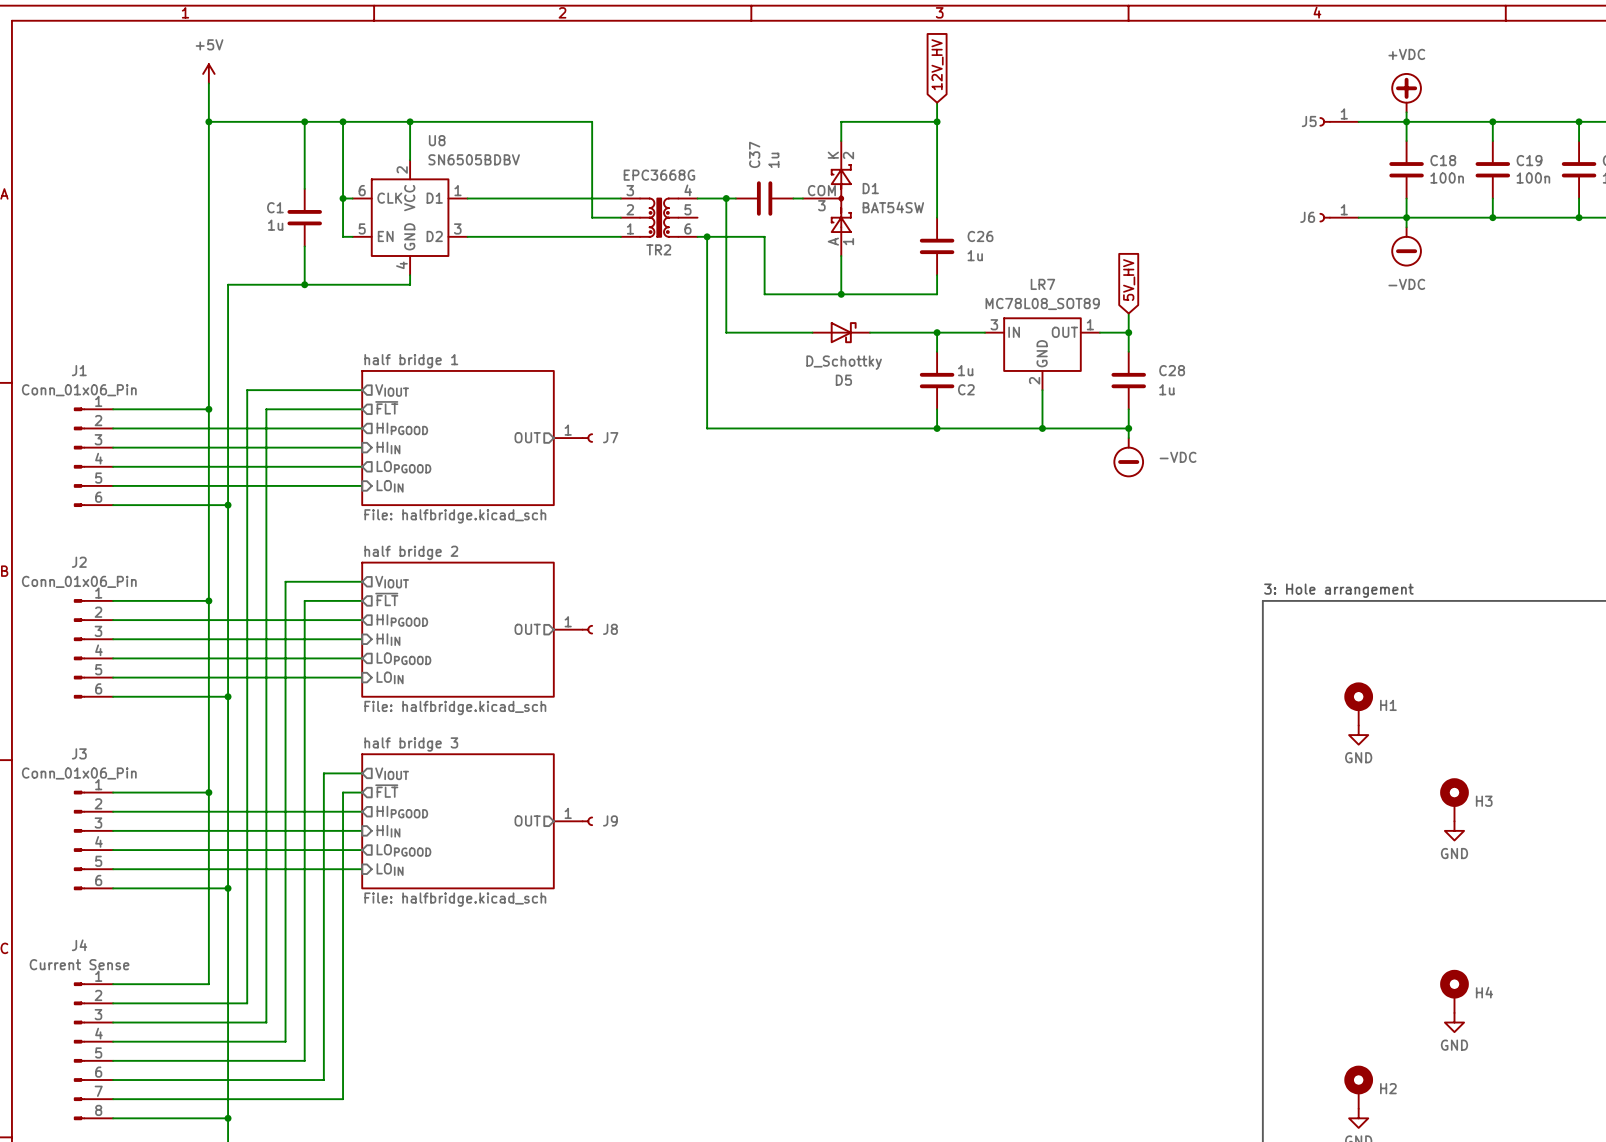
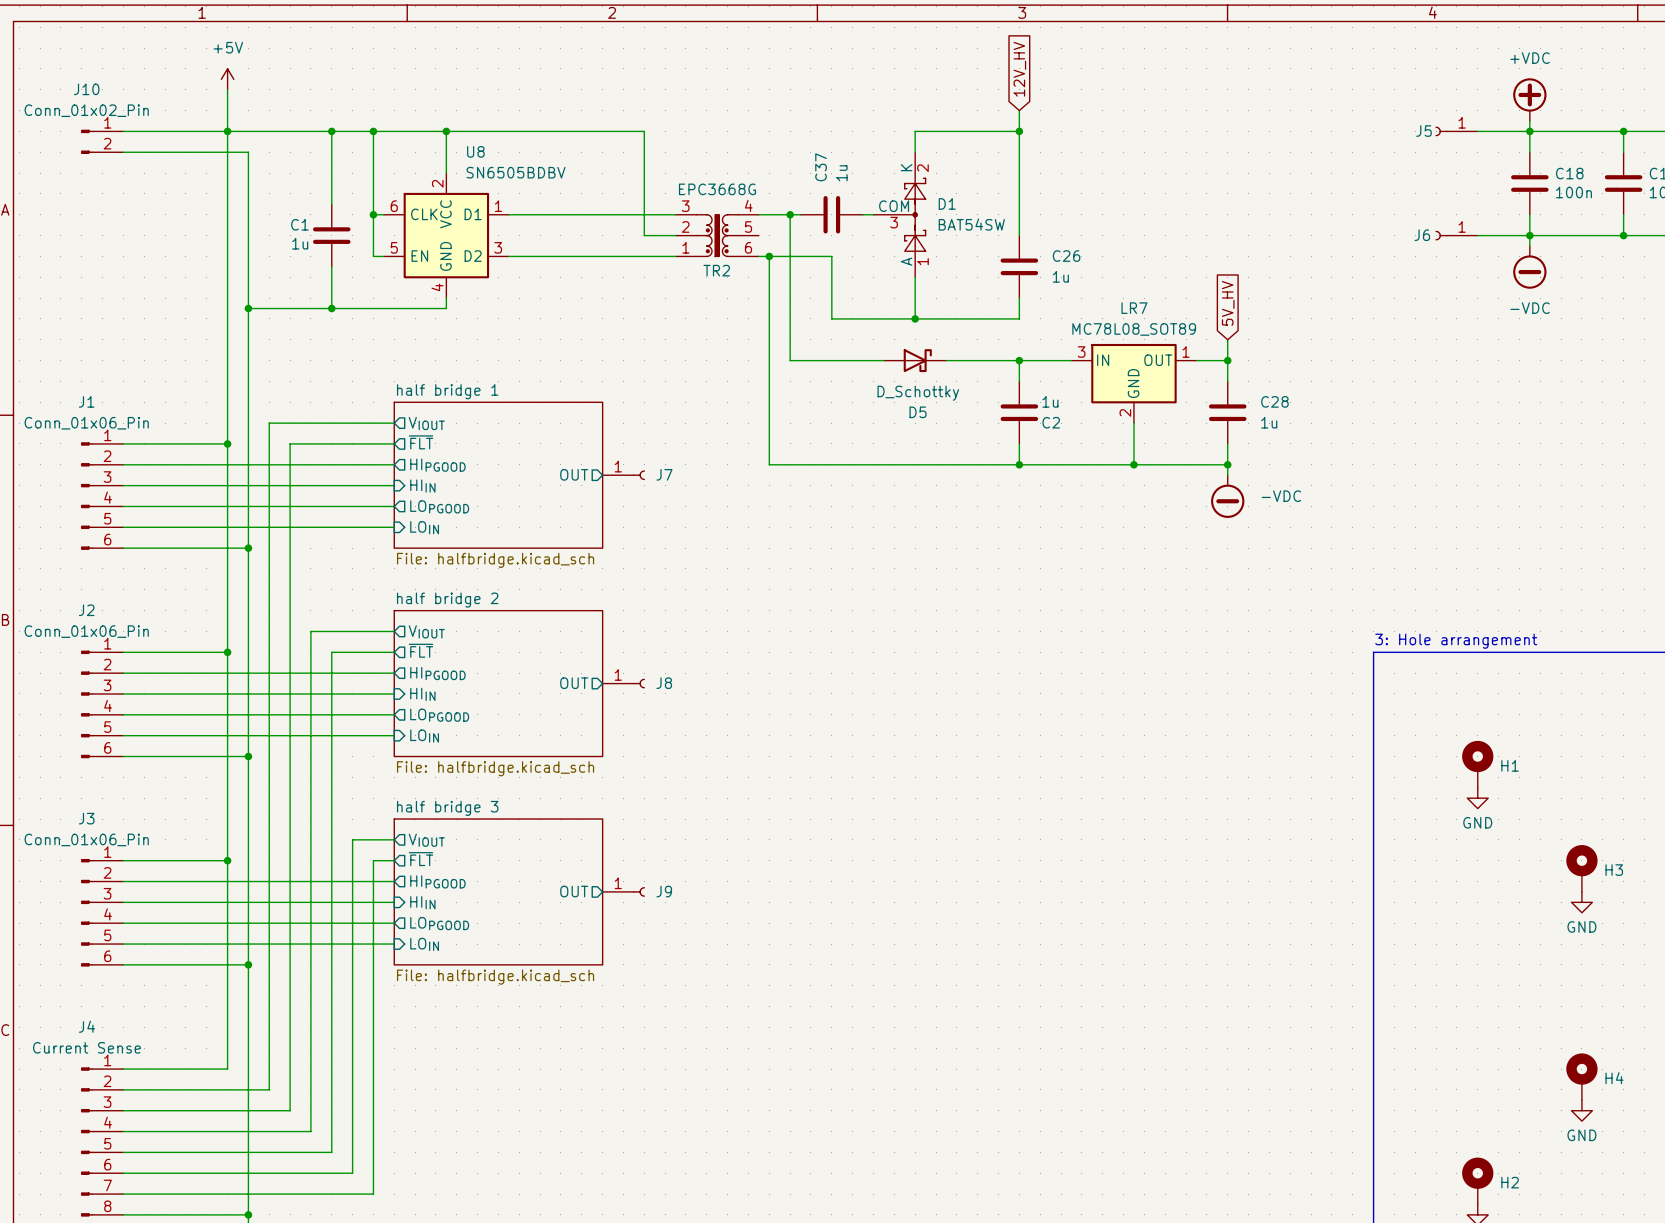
wire: none -> (123, 131) (227, 131)
J10: none -> Conn_01x02_Pin (102, 141)
wire: none -> (123, 152) (248, 152) (248, 308)
junction: none -> (248, 308)

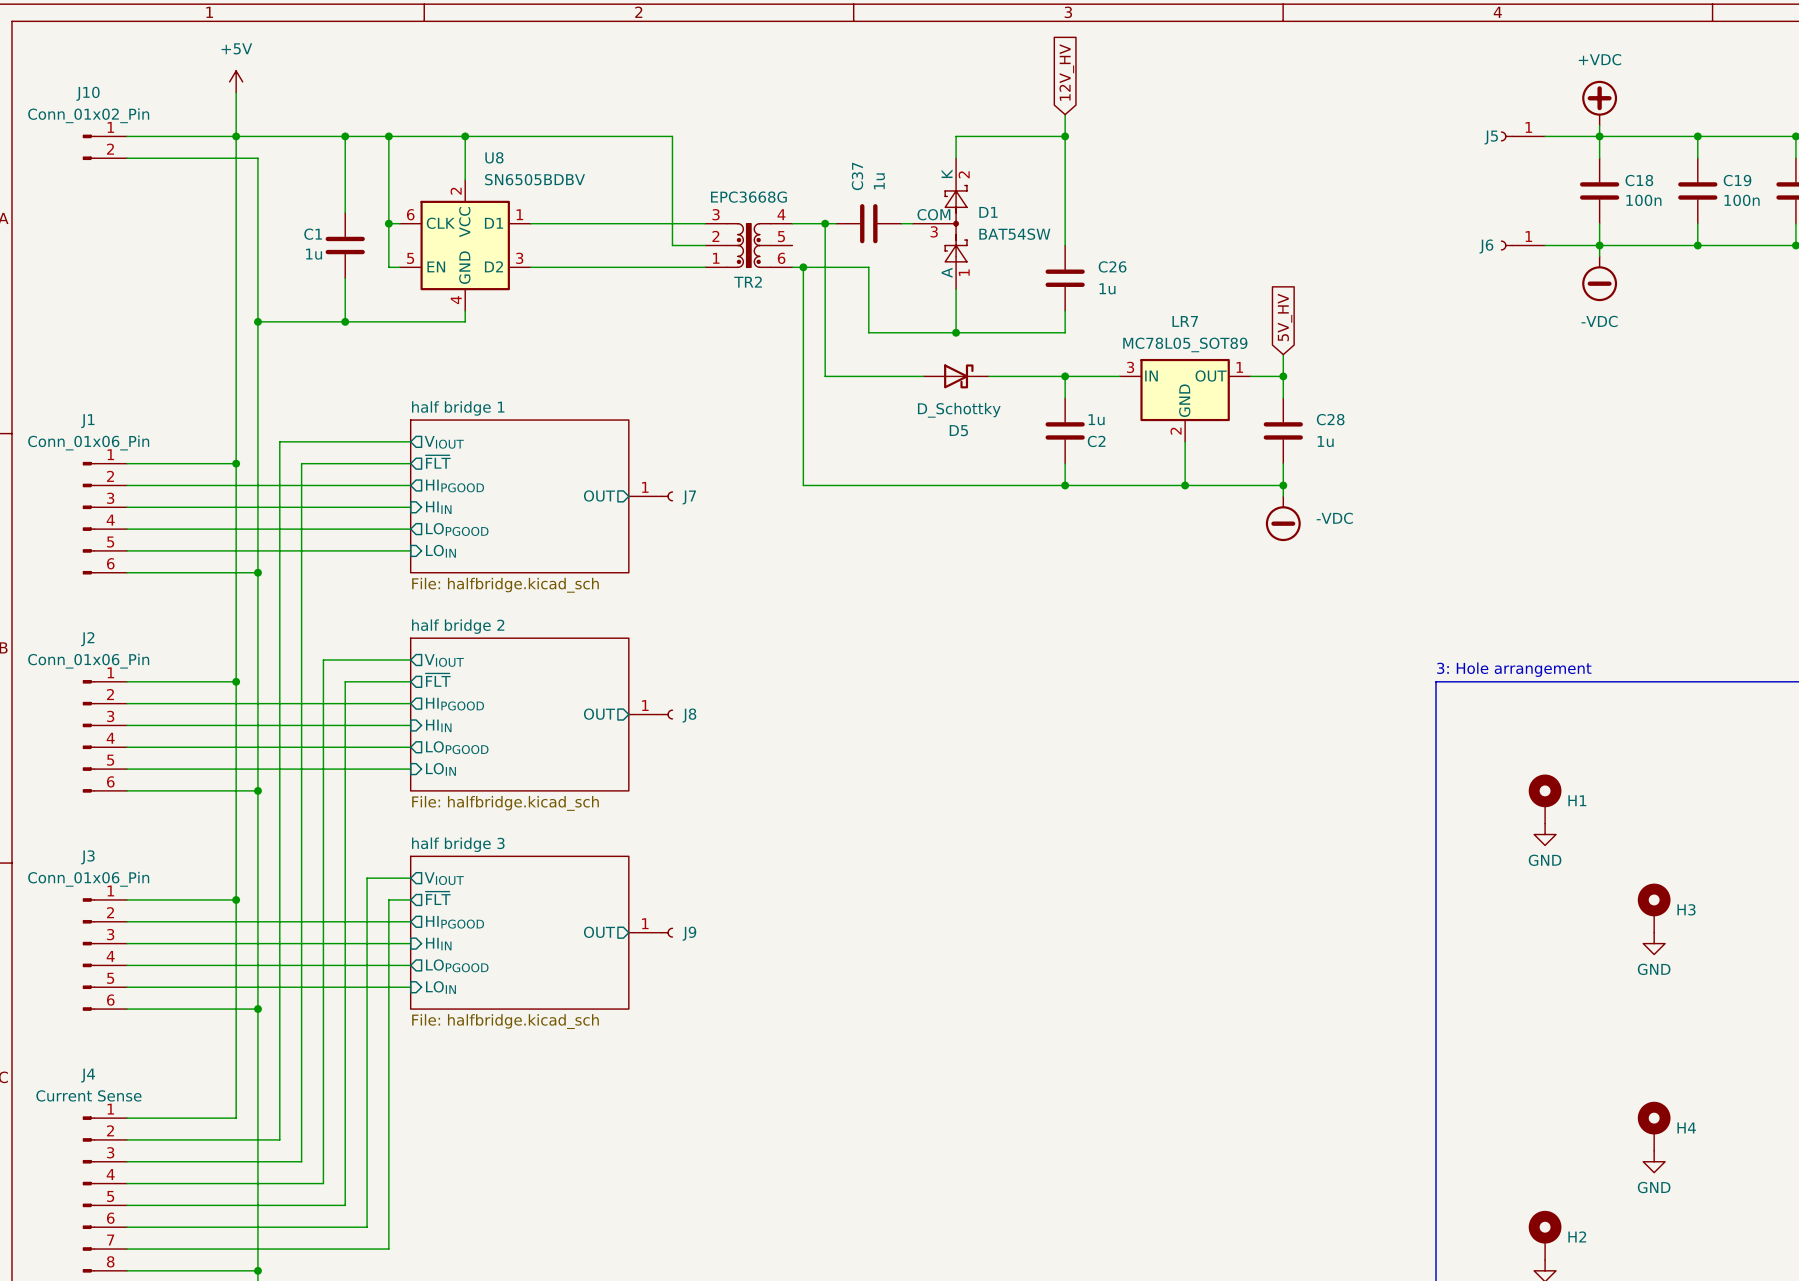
LR7 value: MC78L08_SOT89 (1134, 329) -> MC78L05_SOT89 (1185, 344)

